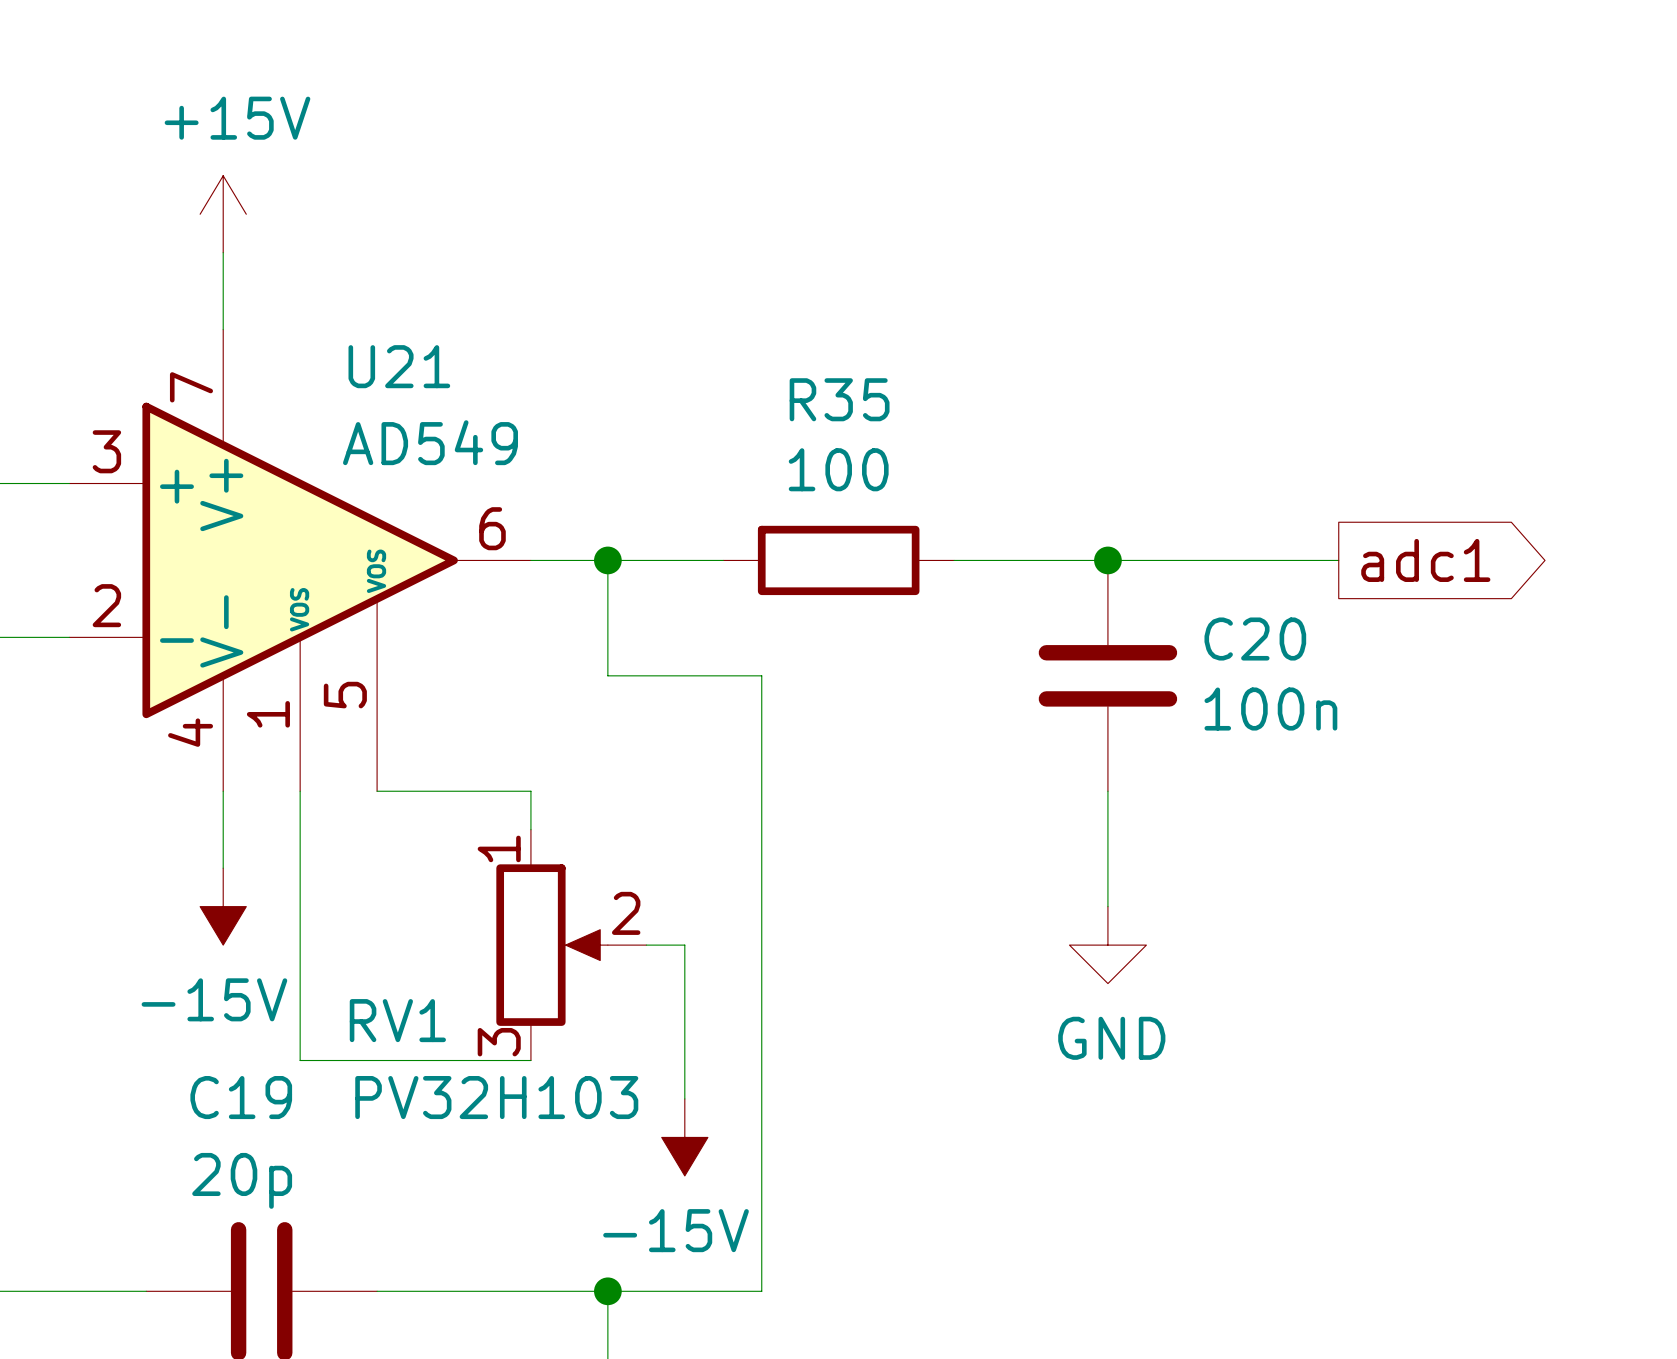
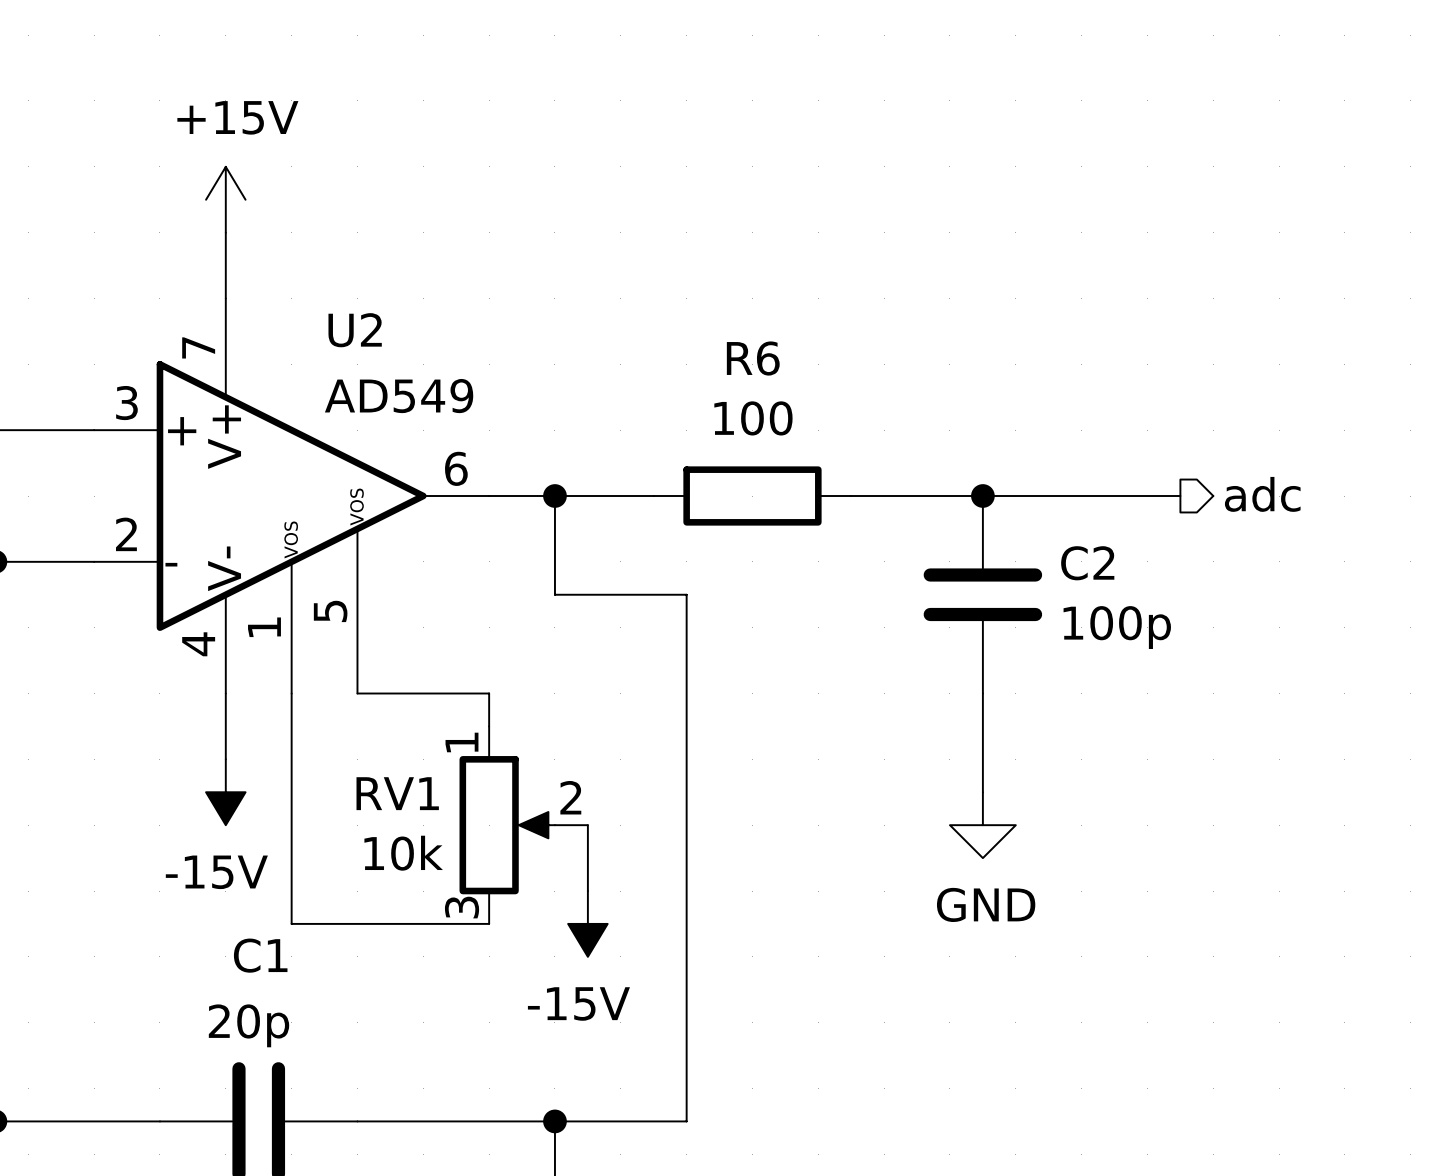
U21 name: U21 (399, 366) -> U2 (355, 330)
R35 name: R35 (839, 399) -> R6 (753, 358)
hierarchical label: none -> adc (1262, 494)
global label: adc1 (1425, 560) -> none
C20 name: C20 (1255, 639) -> C2 (1087, 563)
C20 value: 100n (1270, 709) -> 100p (1117, 627)
wire: (646, 945) (684, 945) (684, 1098) -> (587, 825) (587, 891)
RV1 name position: RV1 (397, 1020) -> RV1 (397, 793)
C19 name: C19 (241, 1097) -> C1 (260, 955)
RV1 value: PV32H103 (496, 1097) -> 10k (403, 853)
power symbol position: -15V (684, 1137) -> -15V (587, 923)

